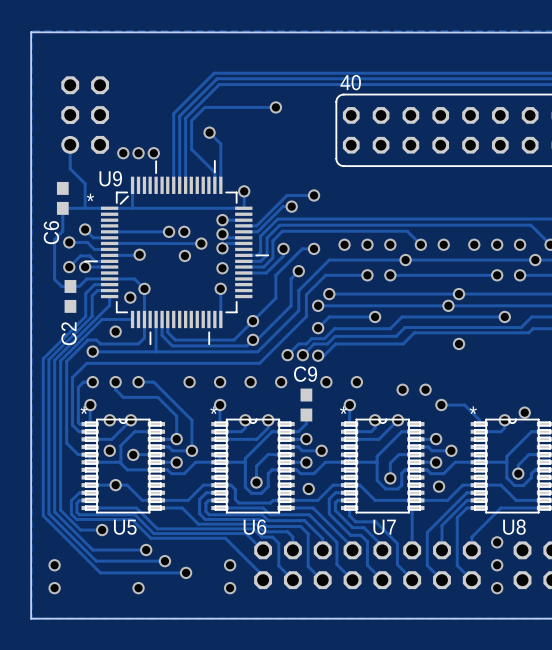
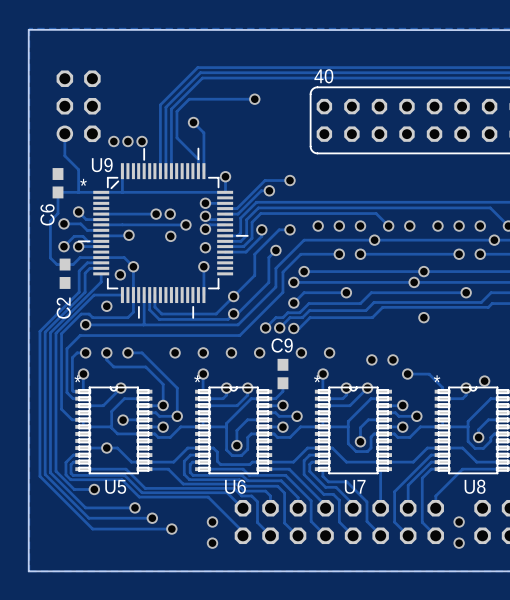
via: (109, 420) -> none
via: (109, 450) -> none
via: (439, 486) -> none
via: (308, 488) -> none
via: (497, 542) -> none
via: (54, 565) -> none
via: (54, 588) -> none
via: (138, 588) -> none

